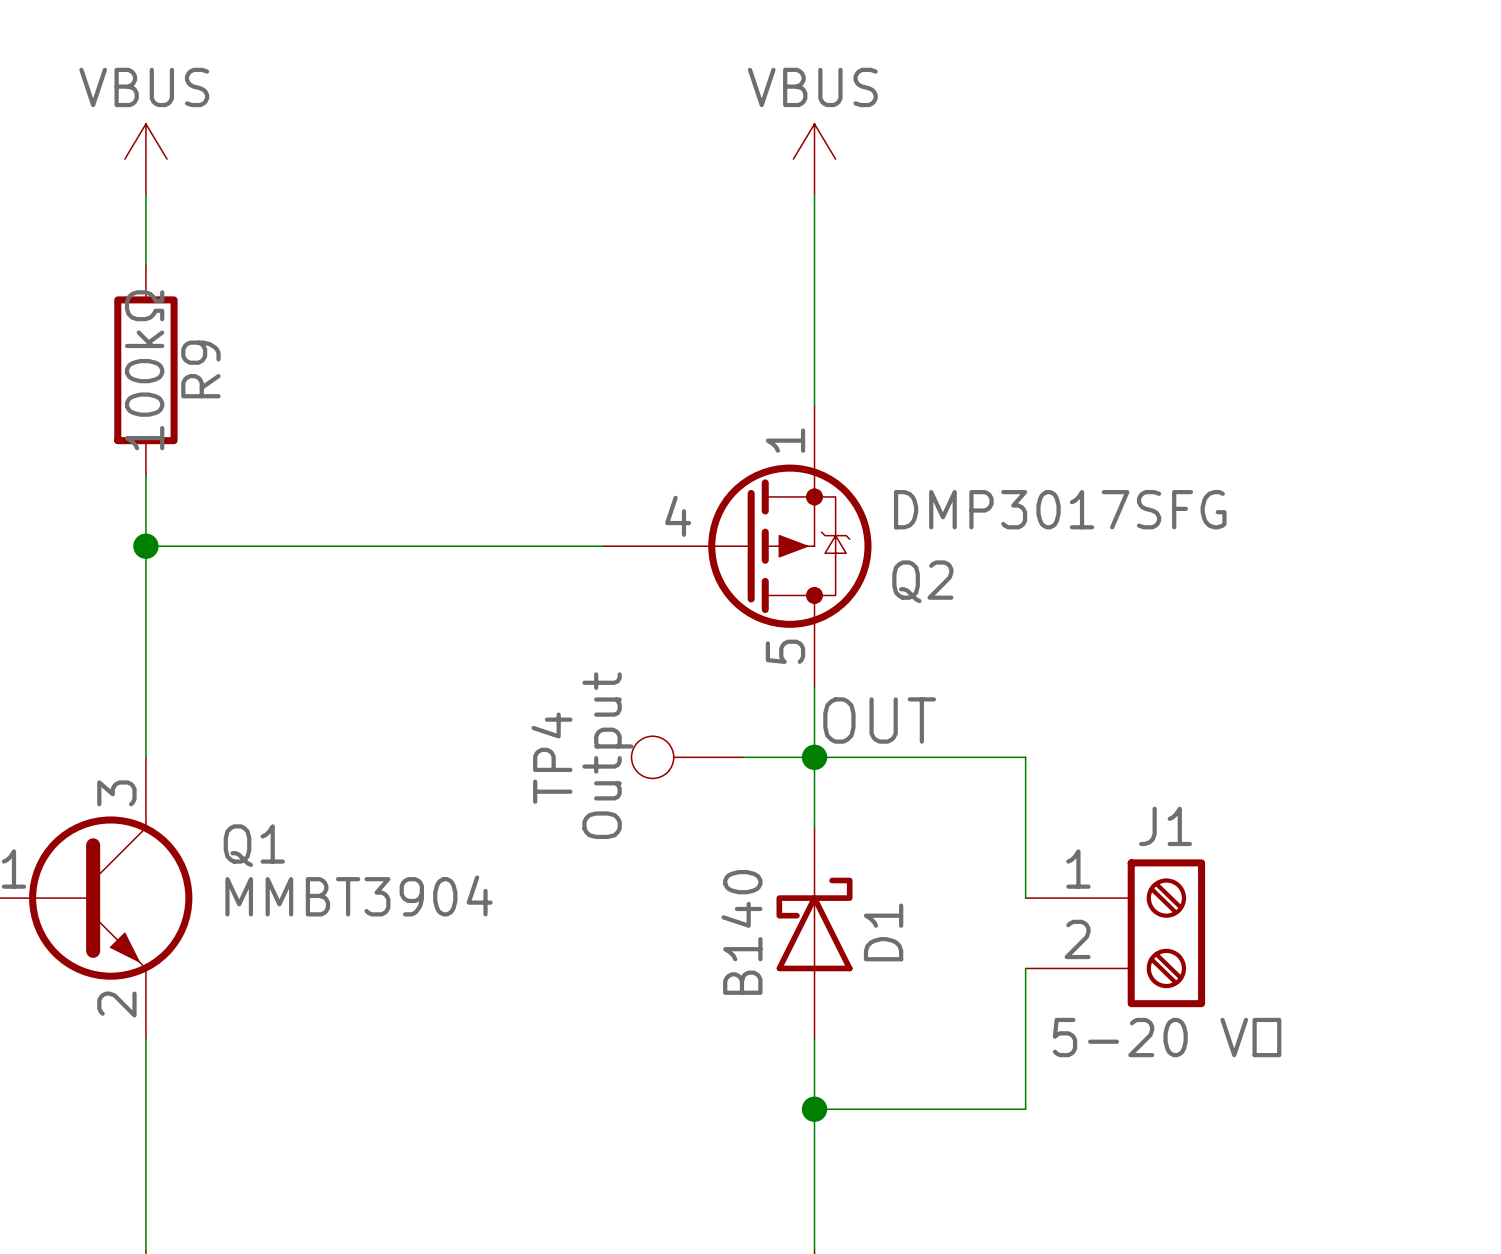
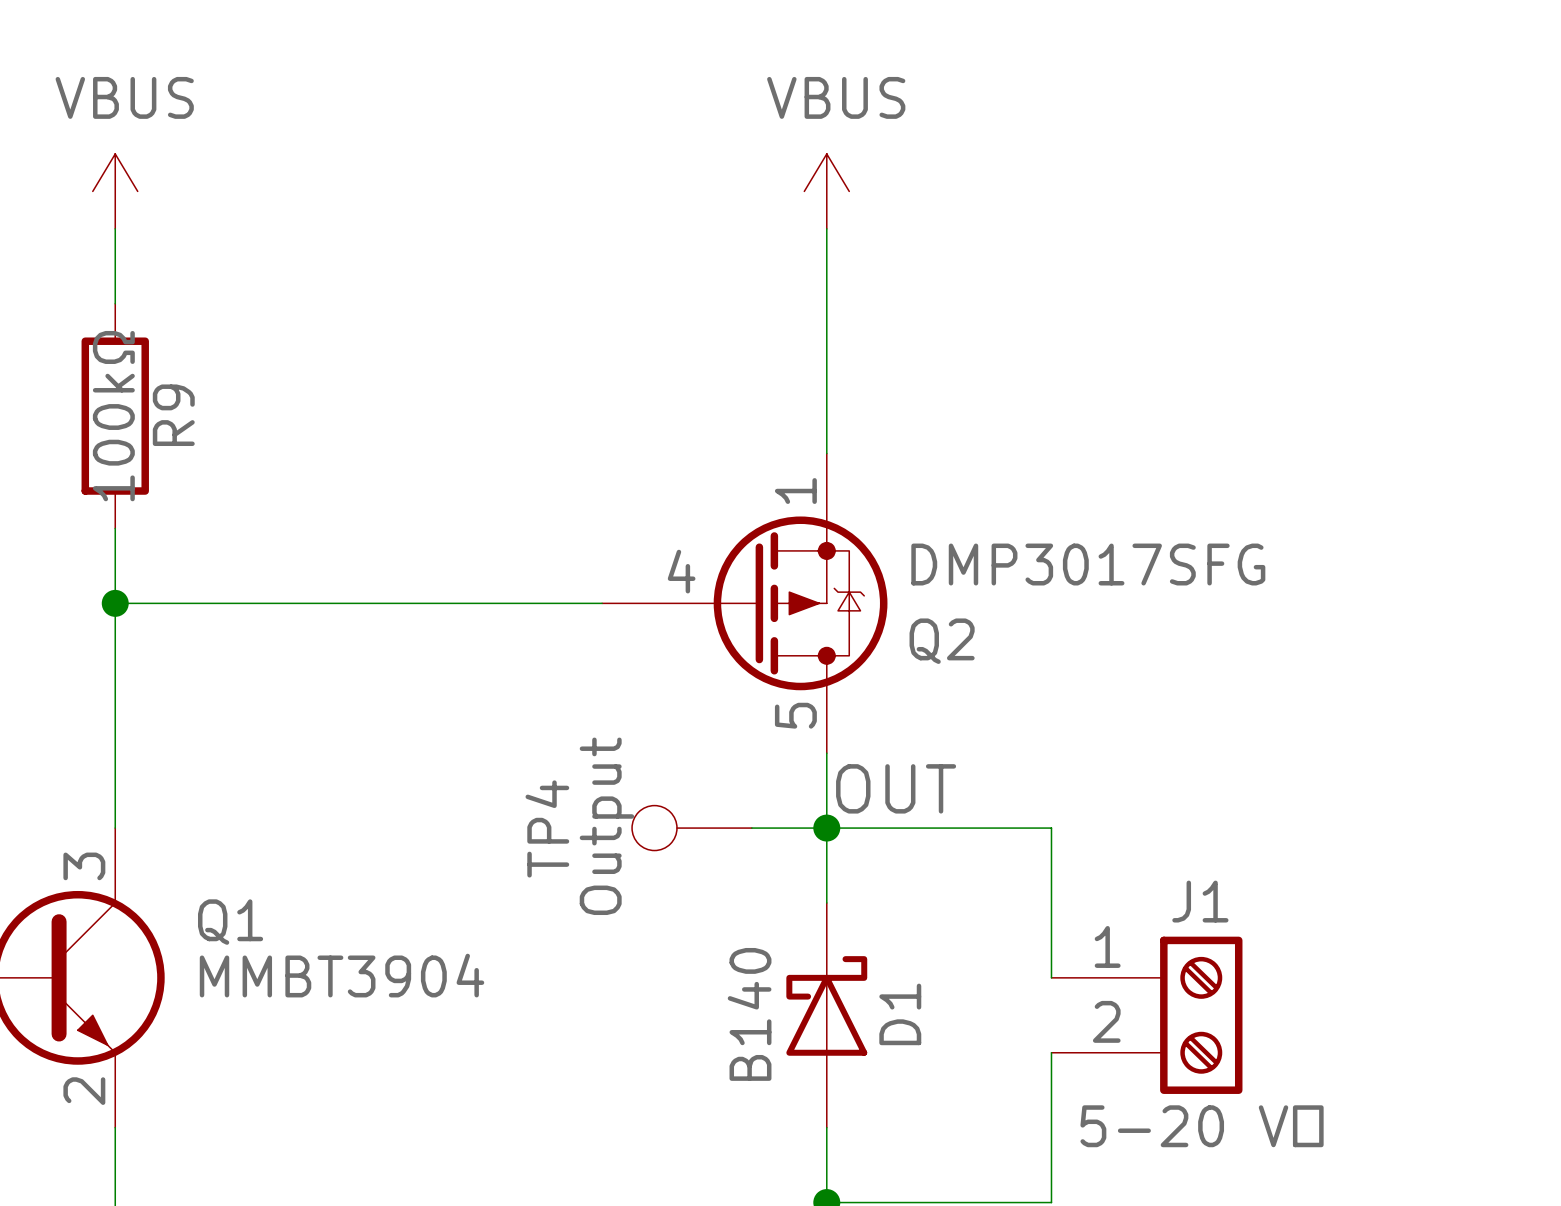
power symbol text position: VBUS (144, 87) -> VBUS (124, 97)
power symbol text position: VBUS (812, 87) -> VBUS (836, 97)

